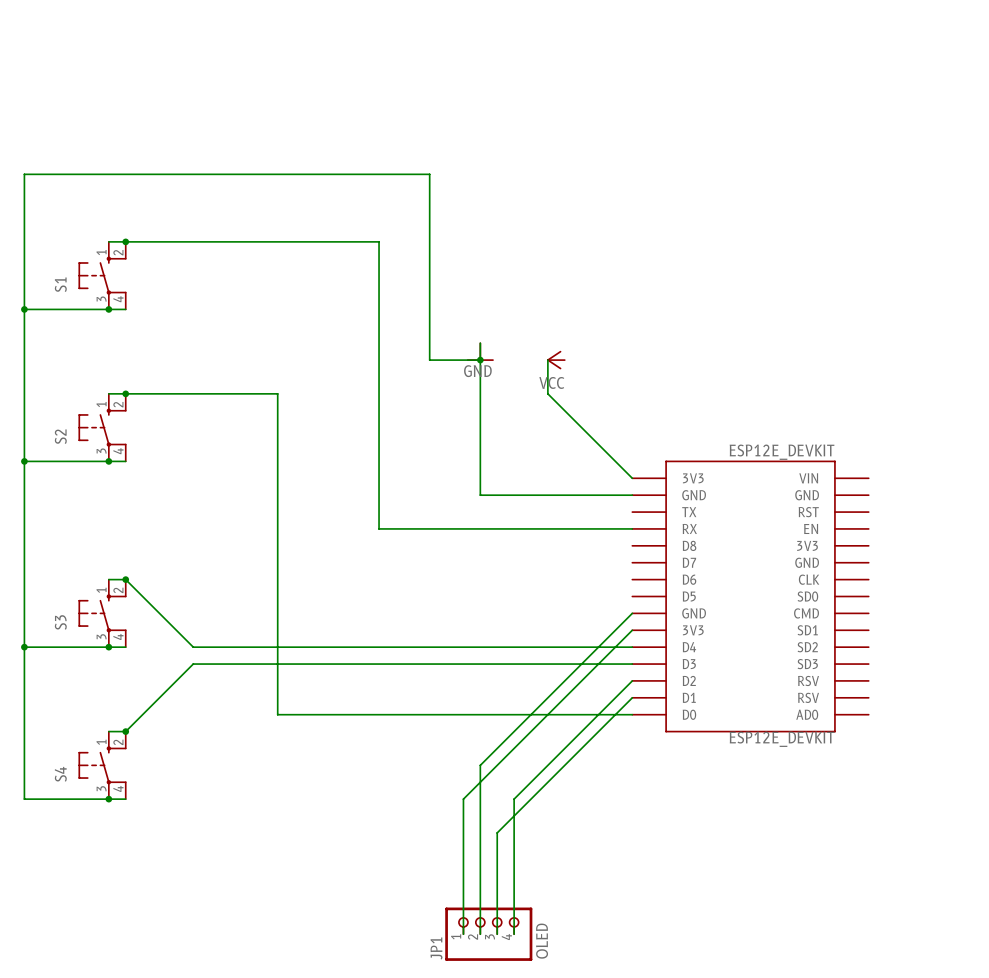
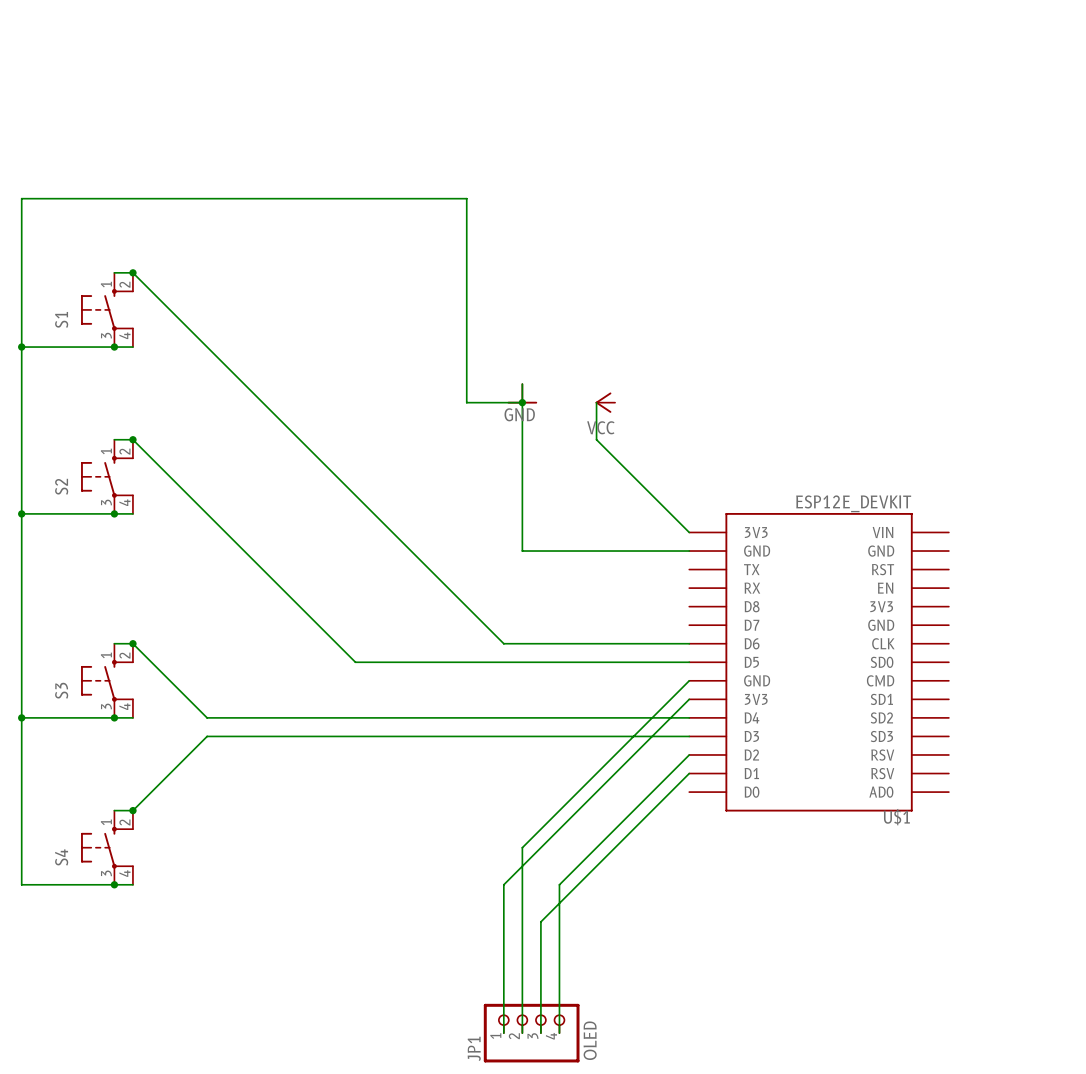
wire: (125, 241) (379, 241) (379, 528) (632, 528) -> (132, 272) (503, 643) (689, 643)
wire: (125, 393) (277, 393) (277, 714) (632, 714) -> (132, 439) (355, 662) (689, 662)
ESP12E_DEVKIT name: ESP12E_DEVKIT (782, 739) -> U$1 (896, 817)

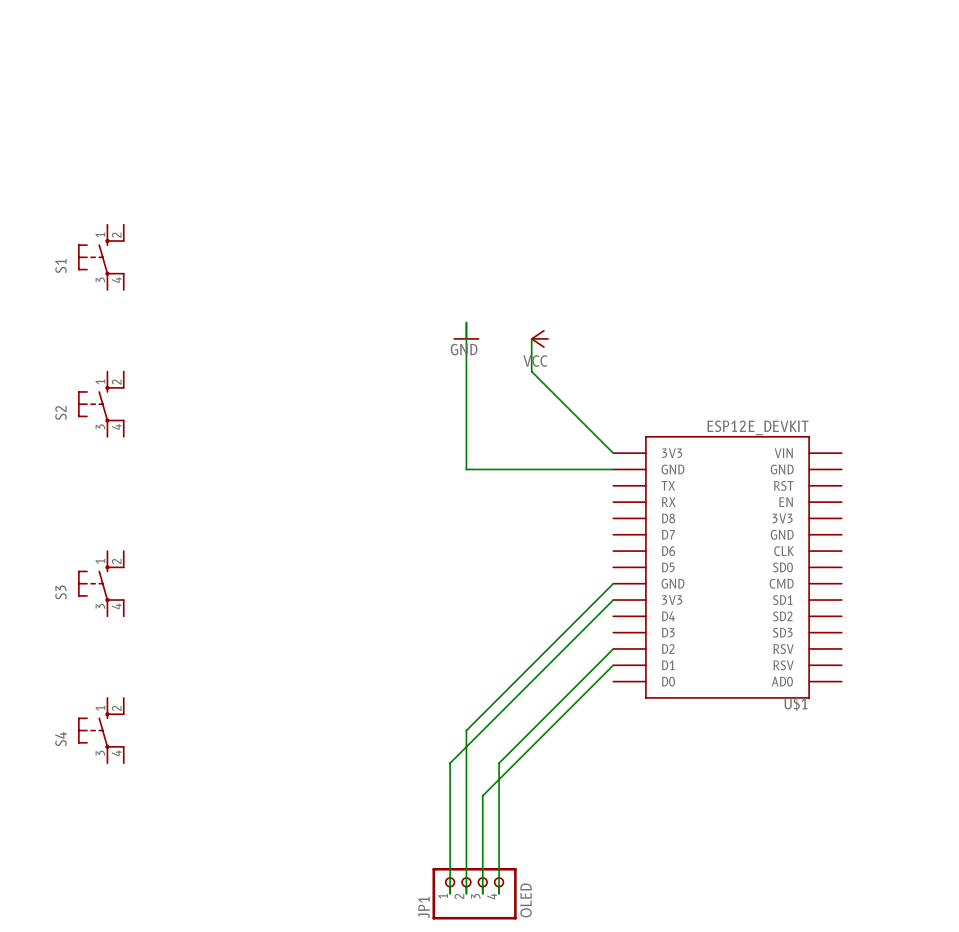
wire: (114, 272) (132, 272) (503, 643) (689, 643) -> none
junction: (132, 272) -> none
wire: (21, 347) (132, 347) -> none
junction: (21, 347) -> none
junction: (114, 347) -> none
wire: (522, 402) (466, 402) (466, 198) (21, 198) (21, 884) (132, 884) -> none
junction: (522, 402) -> none
wire: (114, 439) (132, 439) (355, 662) (689, 662) -> none
junction: (132, 439) -> none
wire: (21, 513) (132, 513) -> none
junction: (21, 513) -> none
junction: (114, 513) -> none
wire: (114, 643) (132, 643) (207, 717) (689, 717) -> none
junction: (132, 643) -> none
wire: (21, 717) (132, 717) -> none
junction: (21, 717) -> none
junction: (114, 717) -> none
wire: (689, 736) (207, 736) (132, 810) (114, 810) -> none
junction: (132, 810) -> none
junction: (114, 884) -> none

